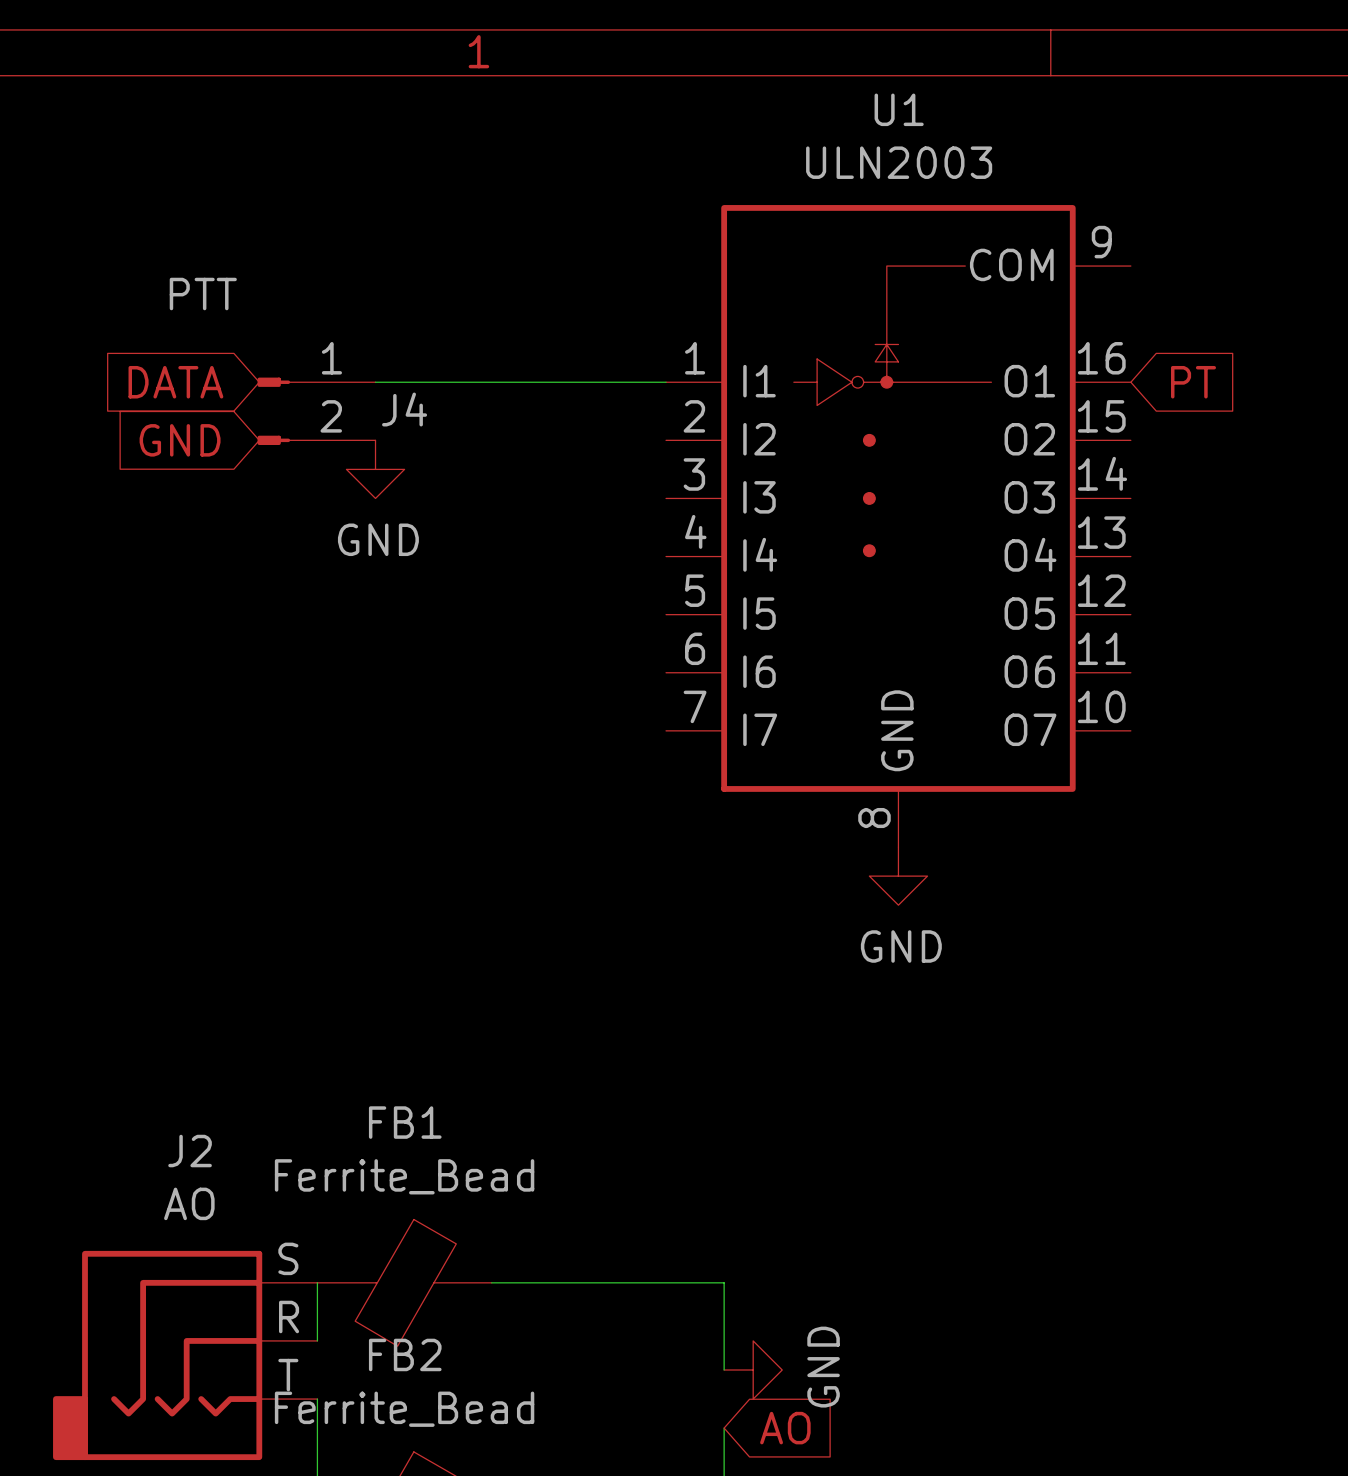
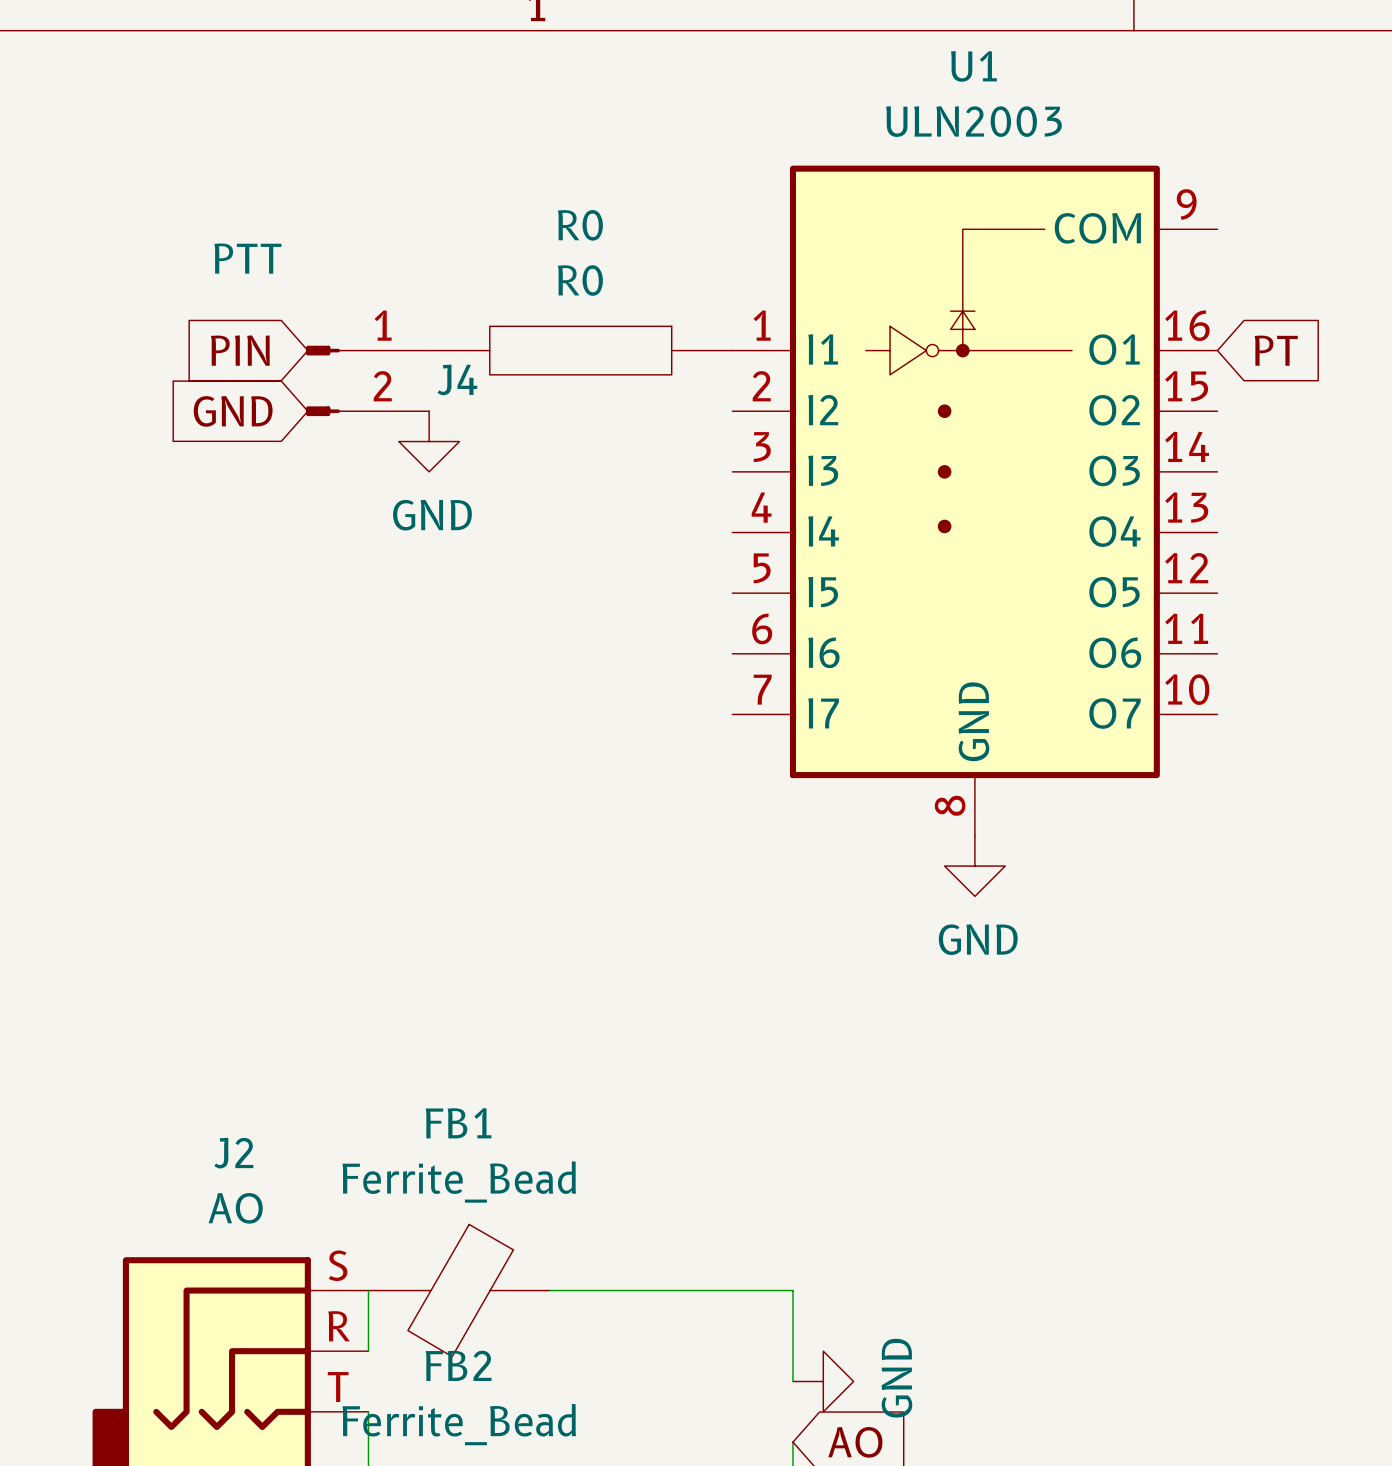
global label: DATA (175, 382) -> PIN (240, 350)
wire: (375, 382) (666, 382) -> none
R0: none -> R0 (580, 350)

